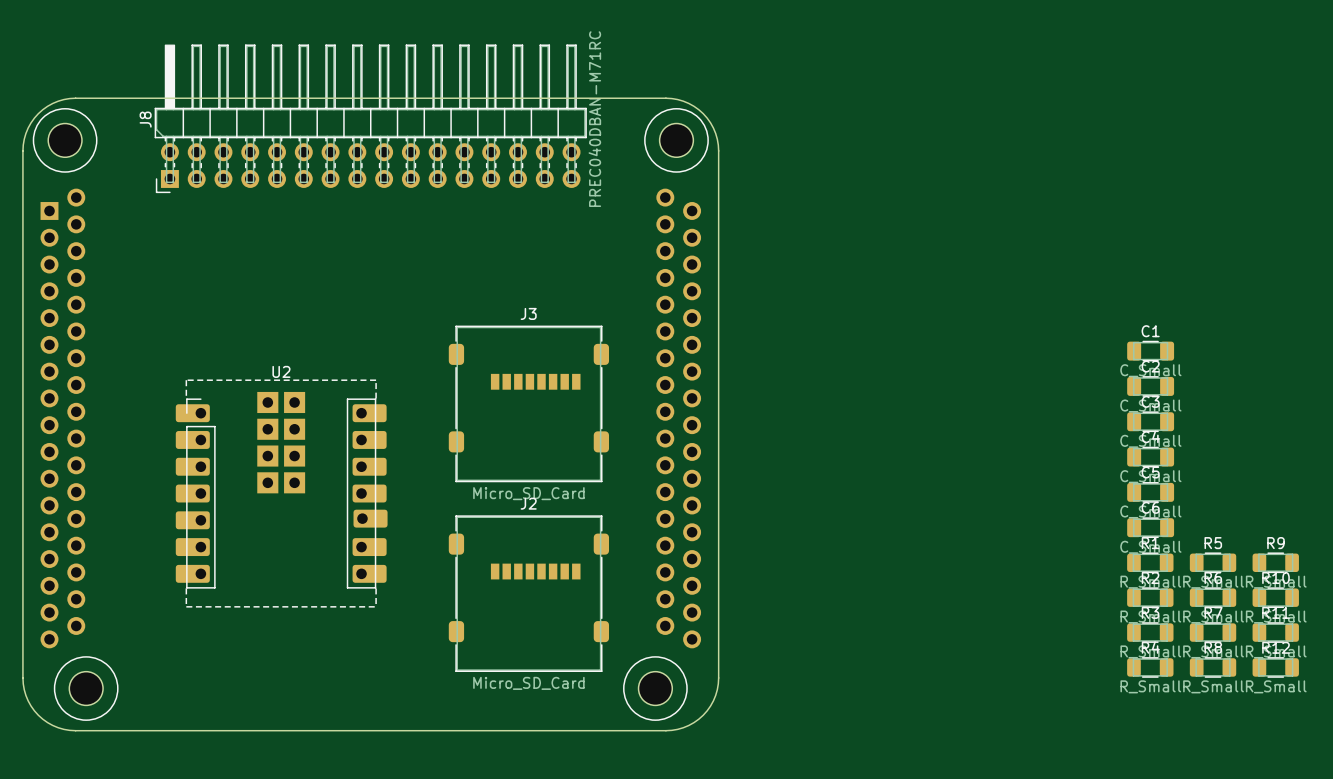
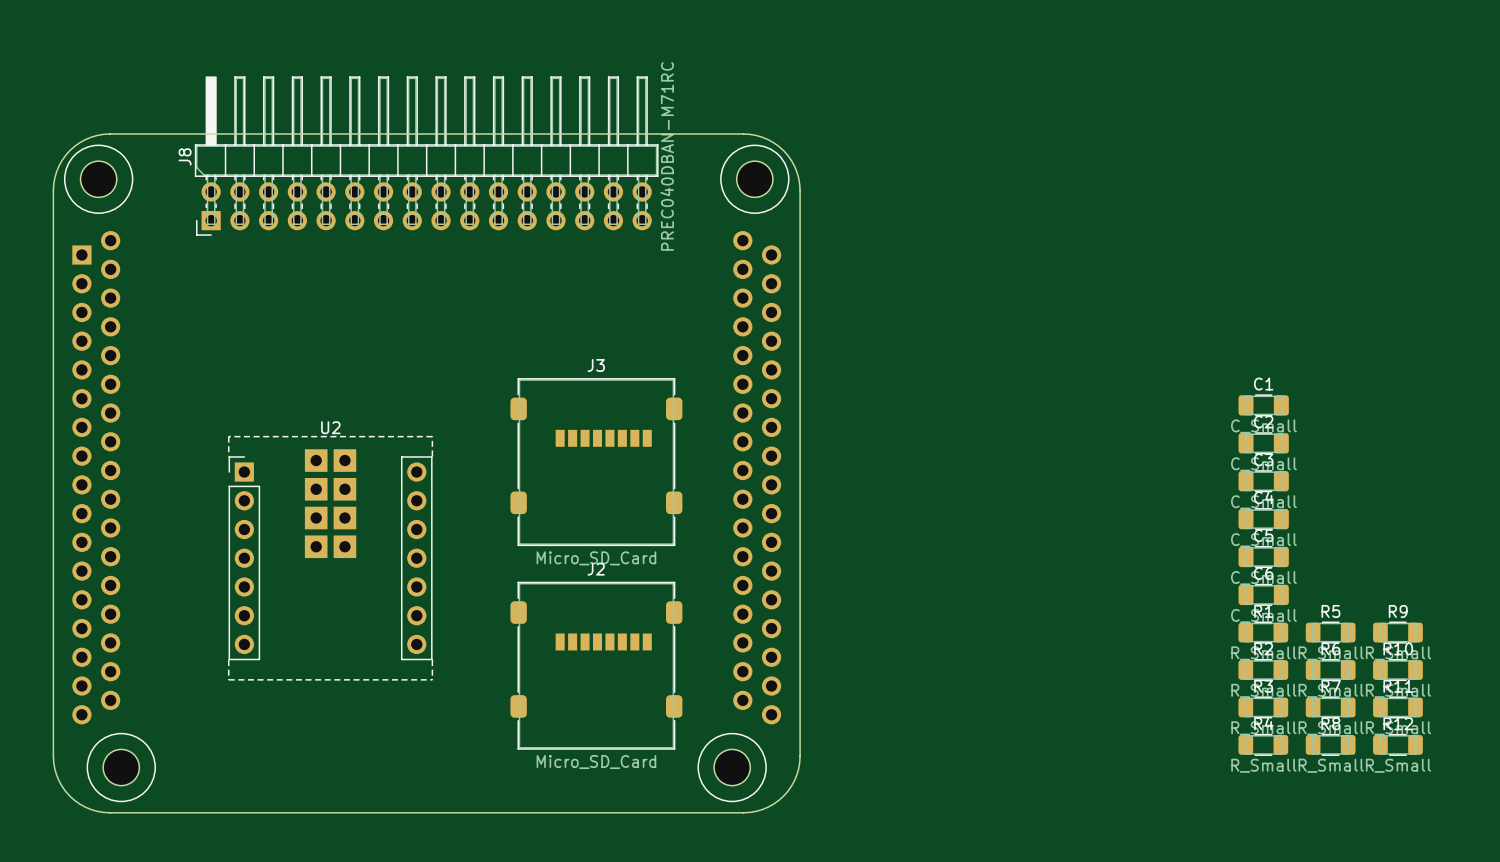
U2 footprint: [175, 379, 388, 608] -> [228, 435, 434, 681]

